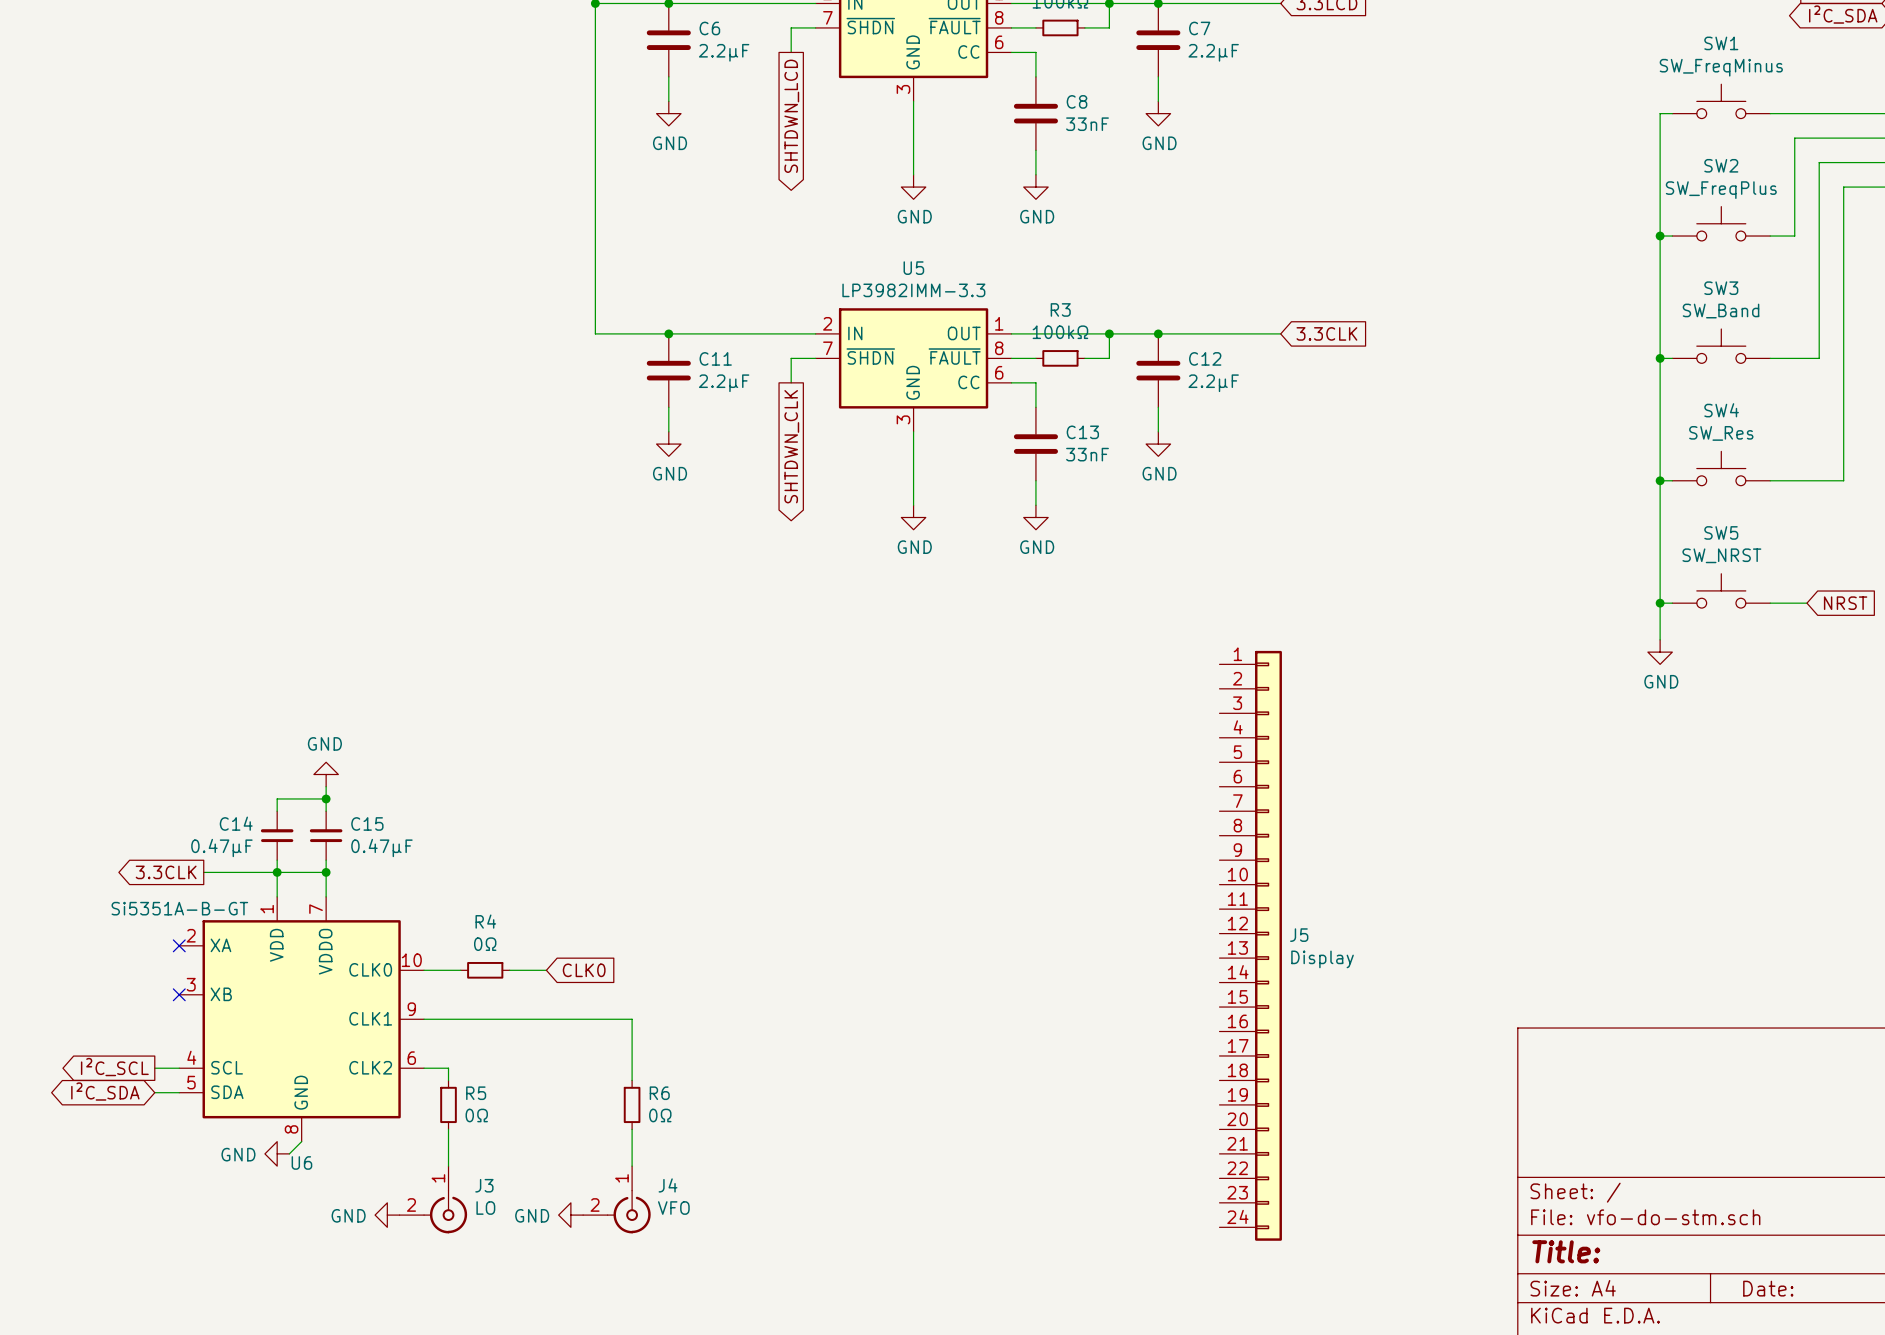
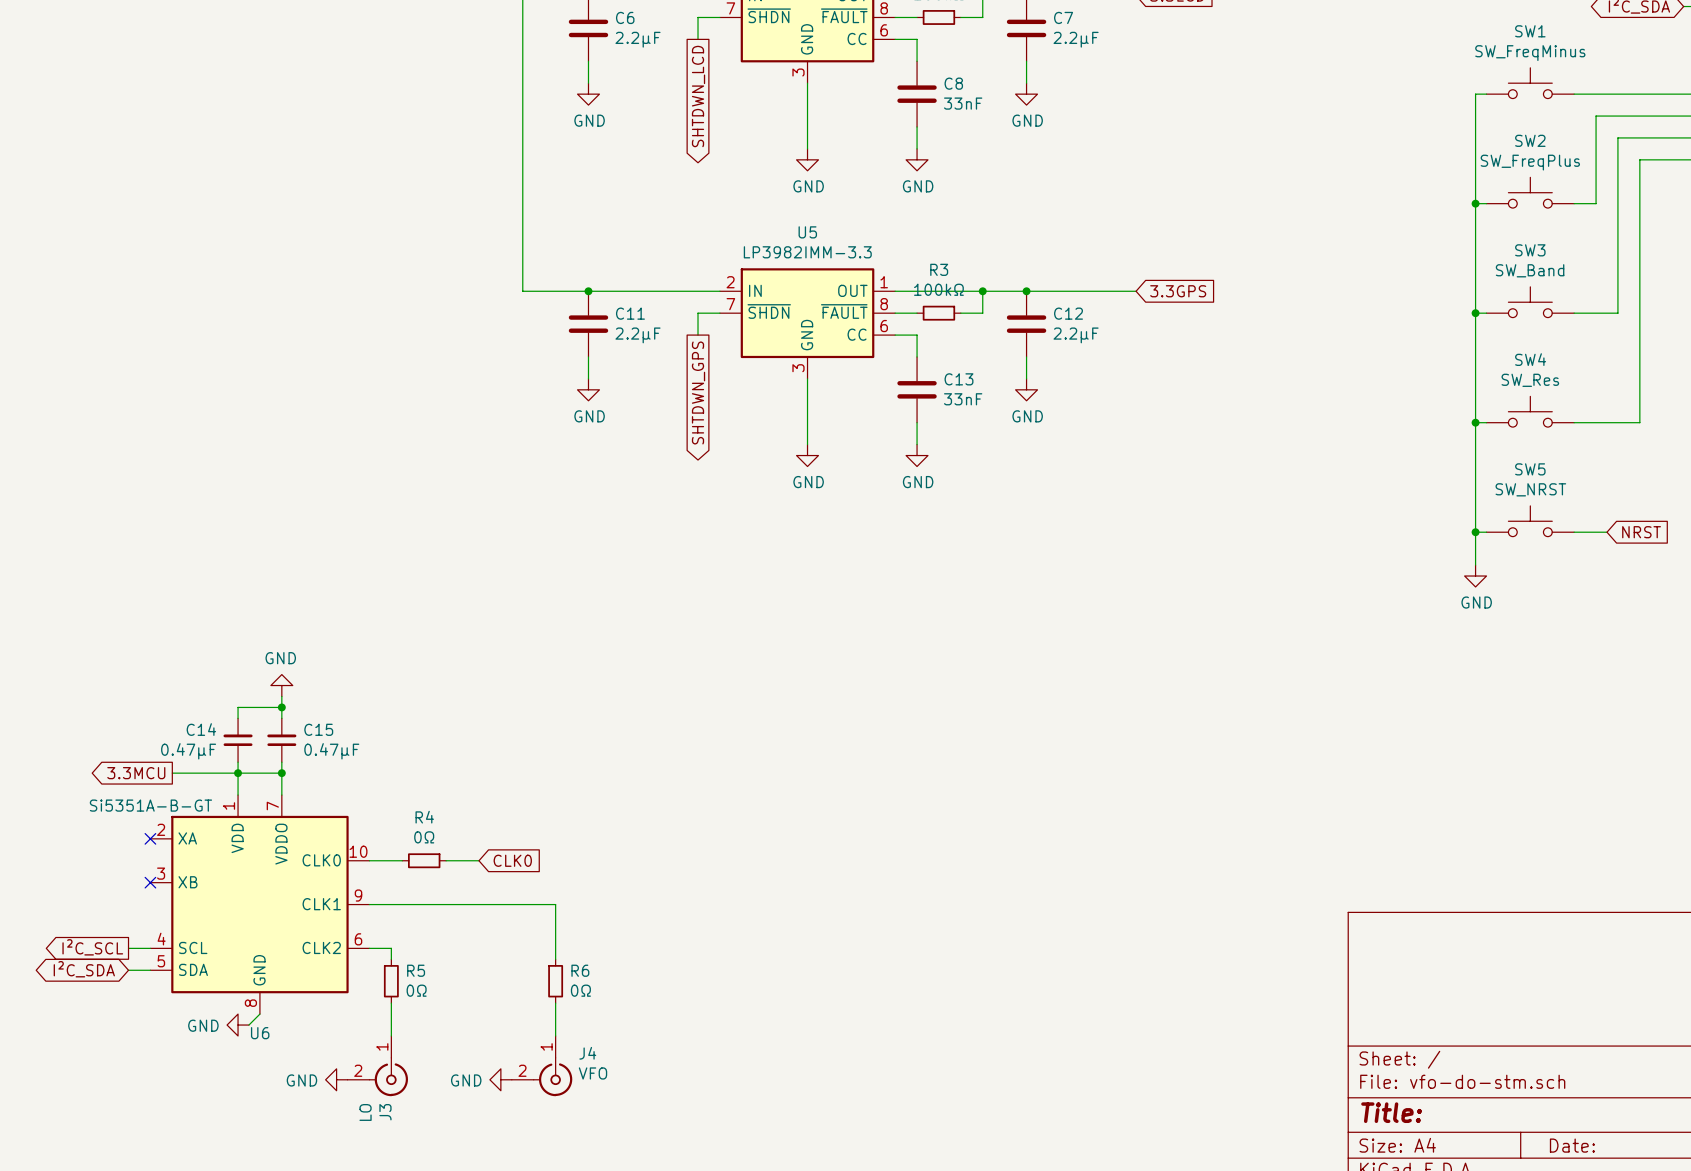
global label: 3.3CLK (1326, 333) -> 3.3GPS (1178, 291)
global label: SHTDWN_CLK (791, 446) -> SHTDWN_GPS (698, 392)
global label: 3.3CLK (166, 872) -> 3.3MCU (136, 773)
J5: Display (1250, 945) -> none
J3 name rotation: 0° (484, 1185) -> 90° counterclockwise (385, 1112)
J3 name position: J3 (484, 1185) -> J3 (385, 1112)
J3 value rotation: 0° (485, 1208) -> 90° counterclockwise (365, 1112)
J3 value position: LO (485, 1208) -> LO (365, 1112)

